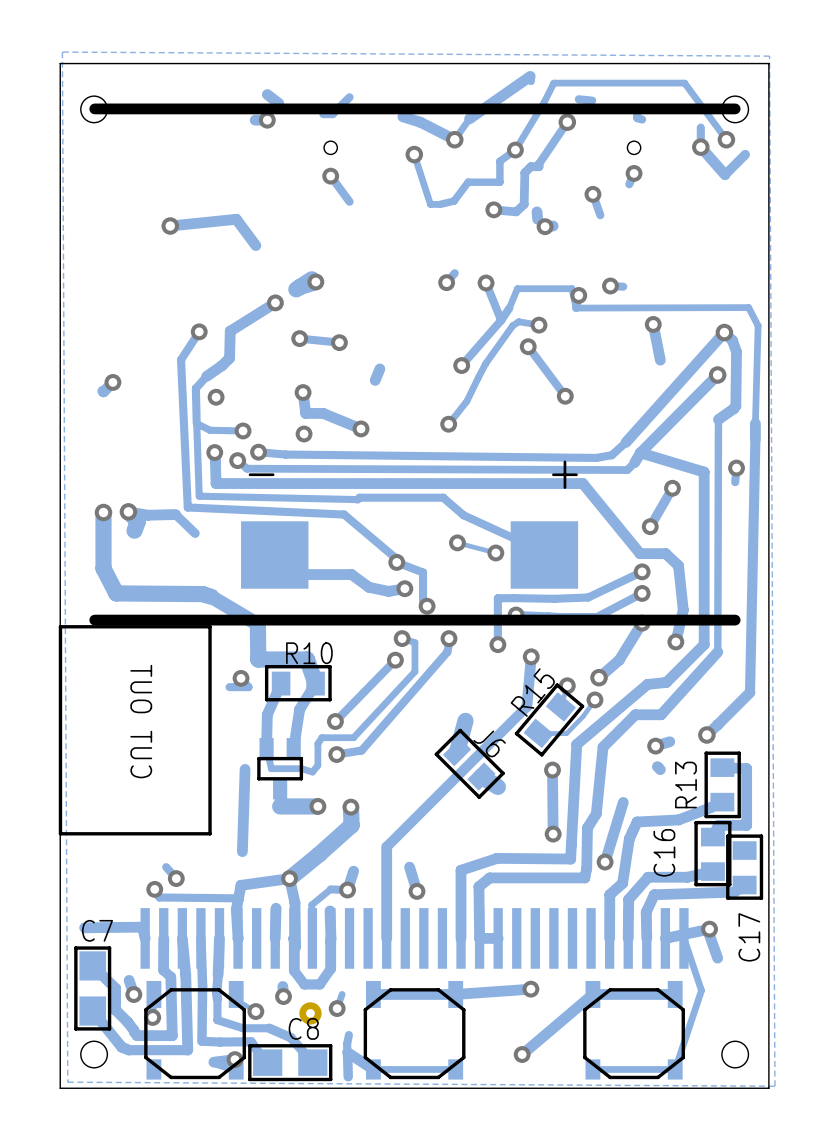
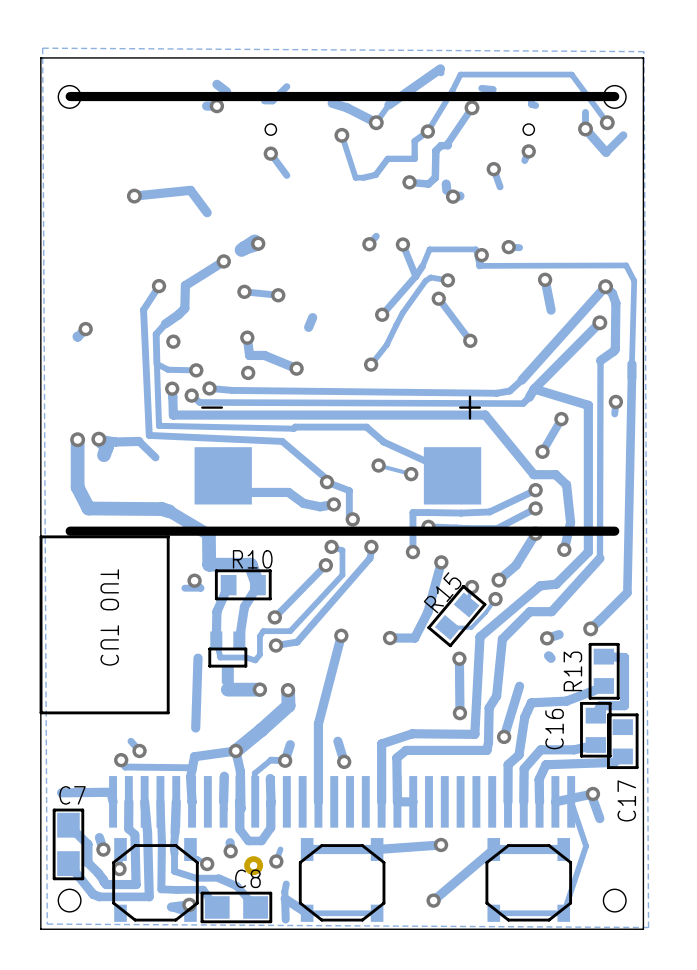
track: (531, 656) (526, 706) (386, 846) -> (441, 562) (427, 612) (414, 638) (390, 638)
track: (465, 720) (457, 752) -> none
track: none -> (341, 635) (318, 723)
via: none -> (341, 635)
via: none -> (390, 638)
J6: (469, 763) -> none
track: (481, 776) (497, 786) -> none

